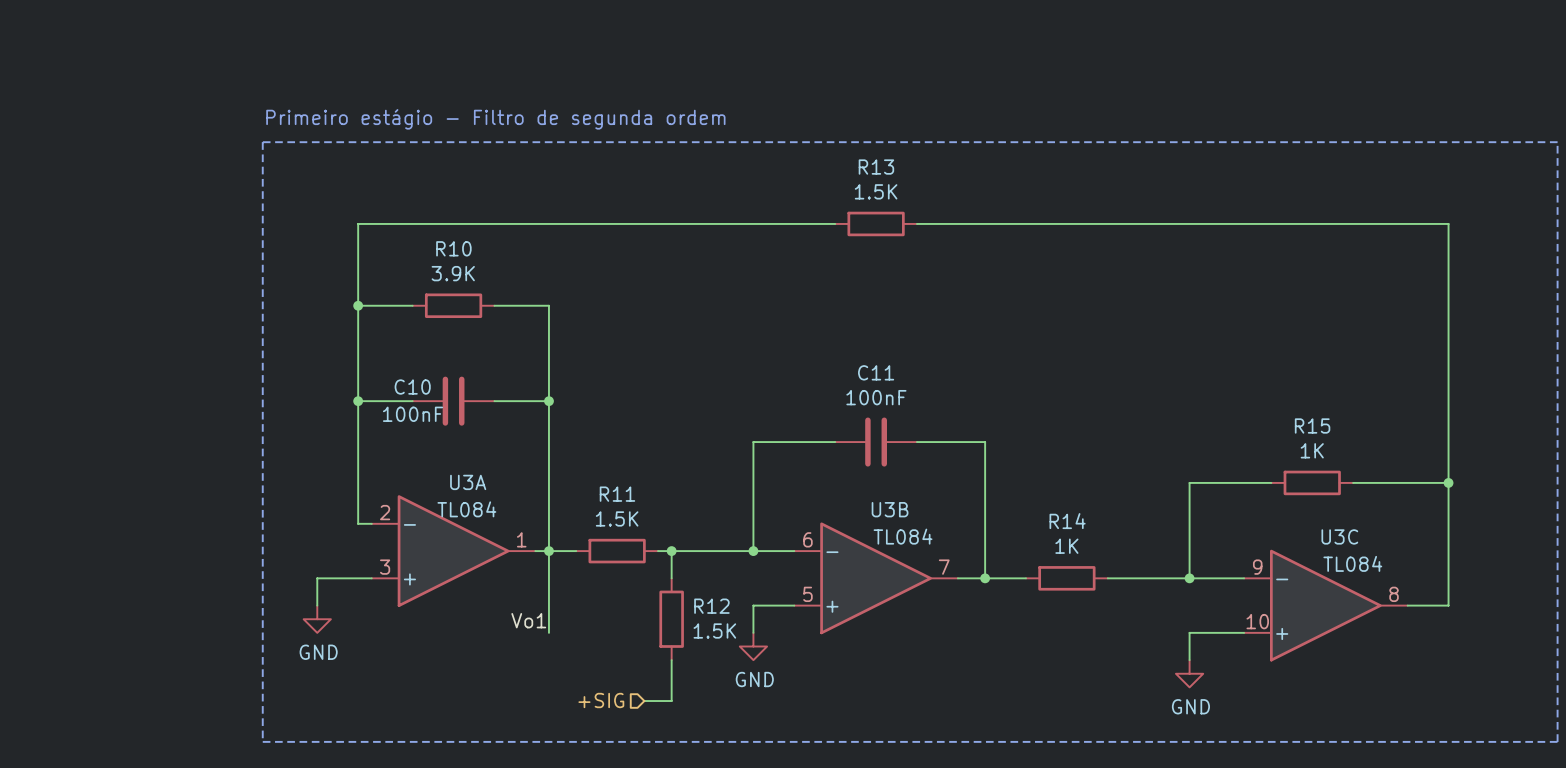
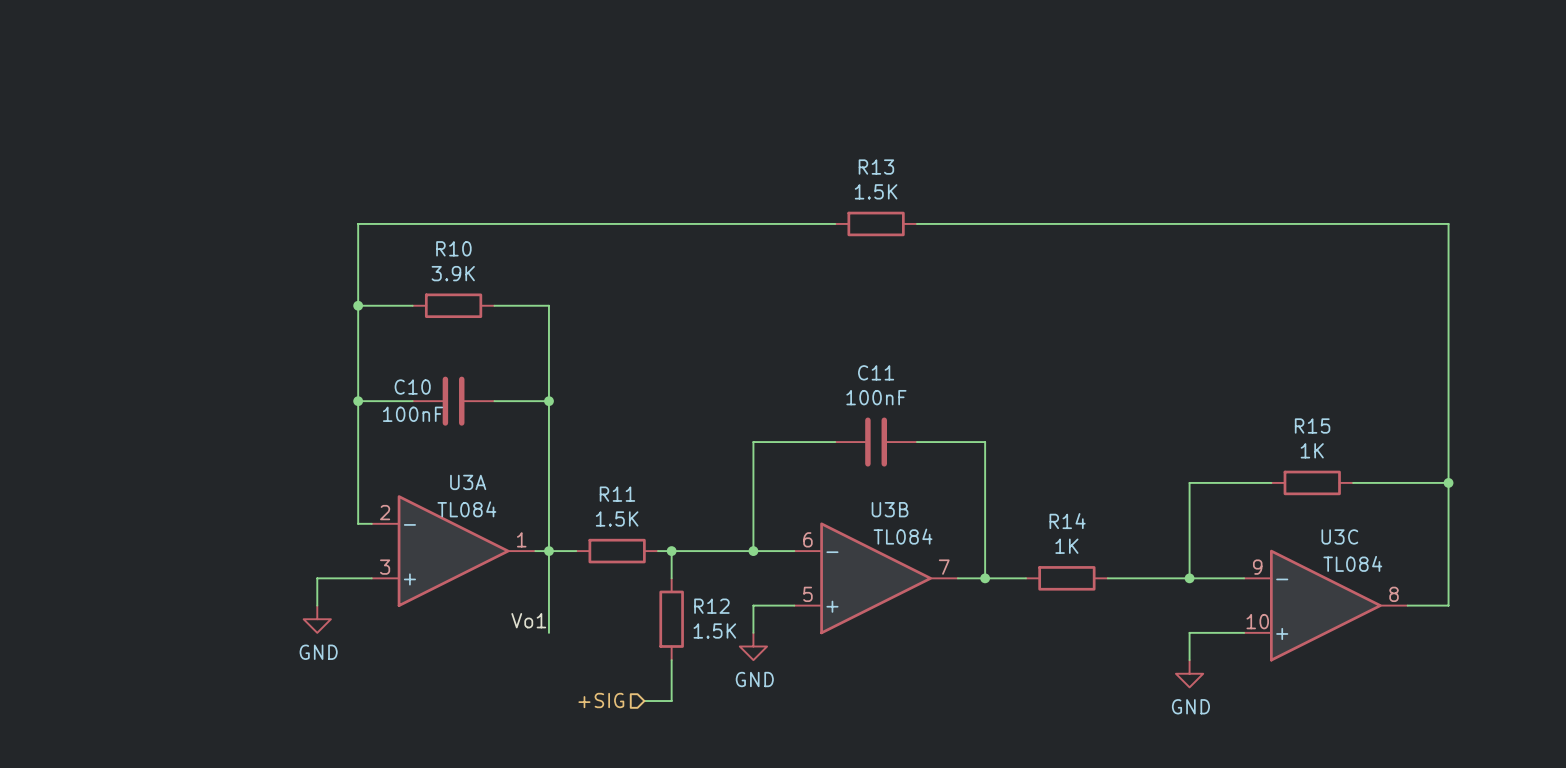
text: Primeiro estágio - Filtro de segunda ordem (495, 119) -> none
line: (262, 142) (262, 741) (1557, 741) (1557, 142) (262, 142) -> none

